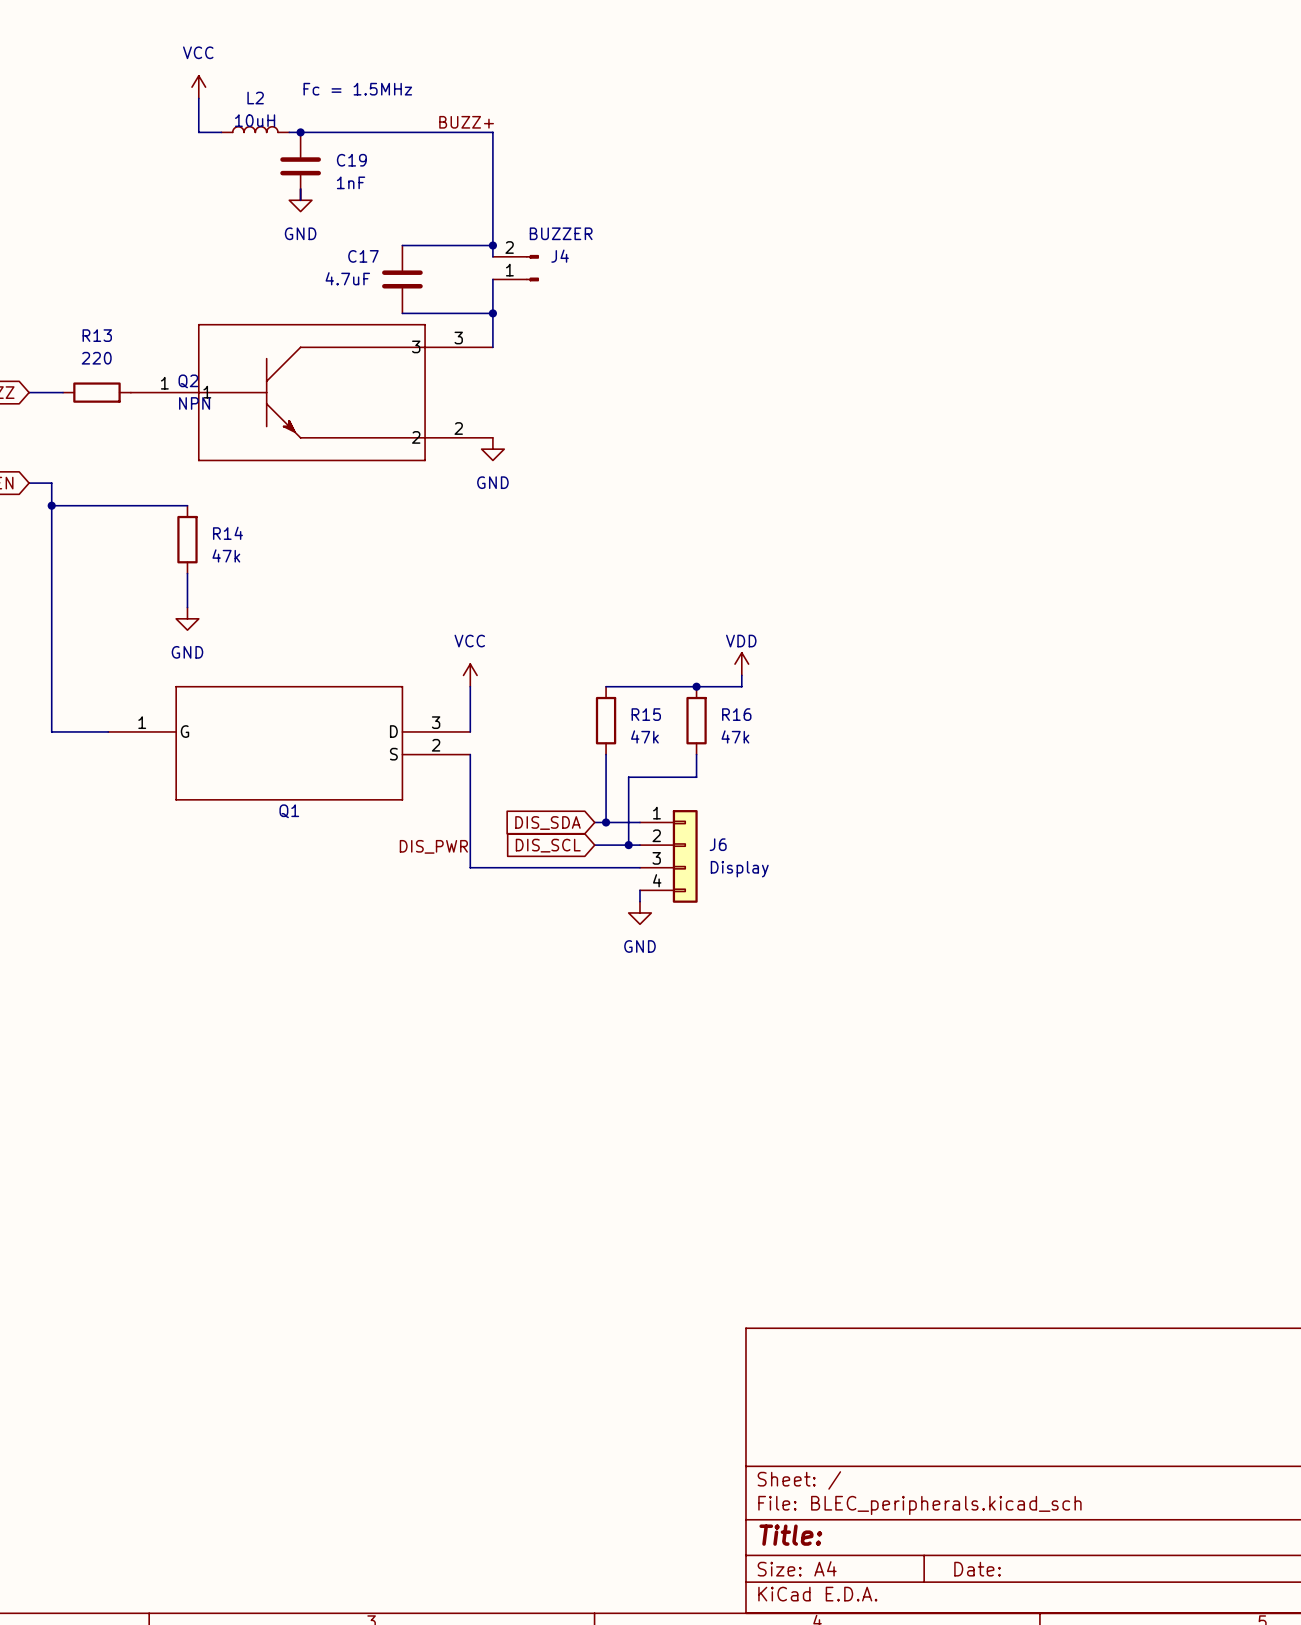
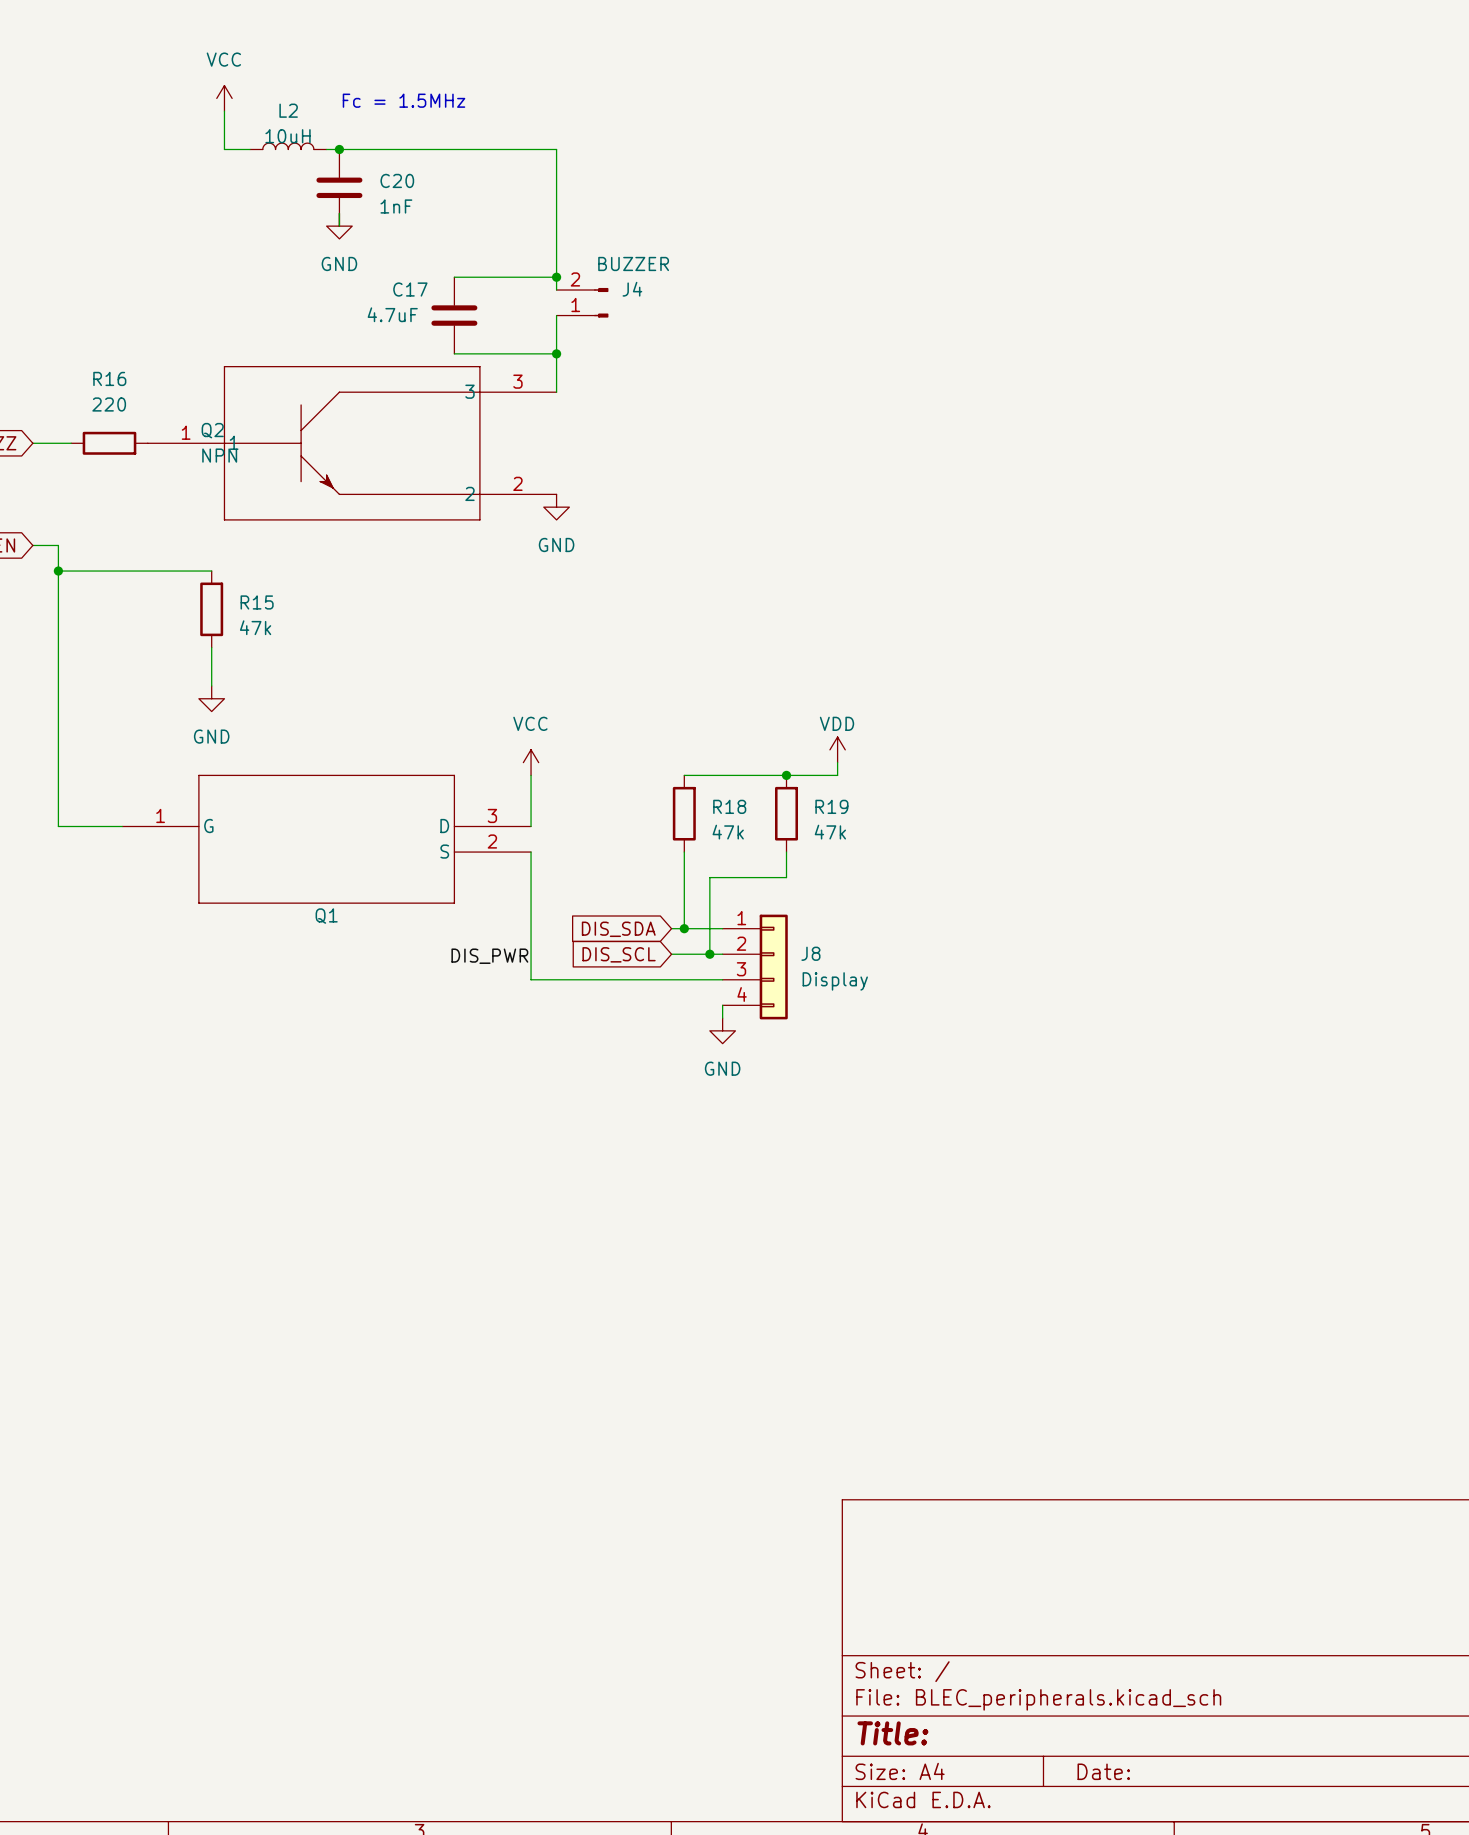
label: BUZZ+ (466, 122) -> none
C19 name: C19 (351, 160) -> C20 (397, 180)
R13 name: R13 (97, 335) -> R16 (109, 378)
R14 name: R14 (227, 533) -> R15 (257, 602)
R15 name: R15 (646, 714) -> R18 (729, 806)
R16 name: R16 (736, 714) -> R19 (831, 806)
J6 name: J6 (718, 844) -> J8 (810, 953)

